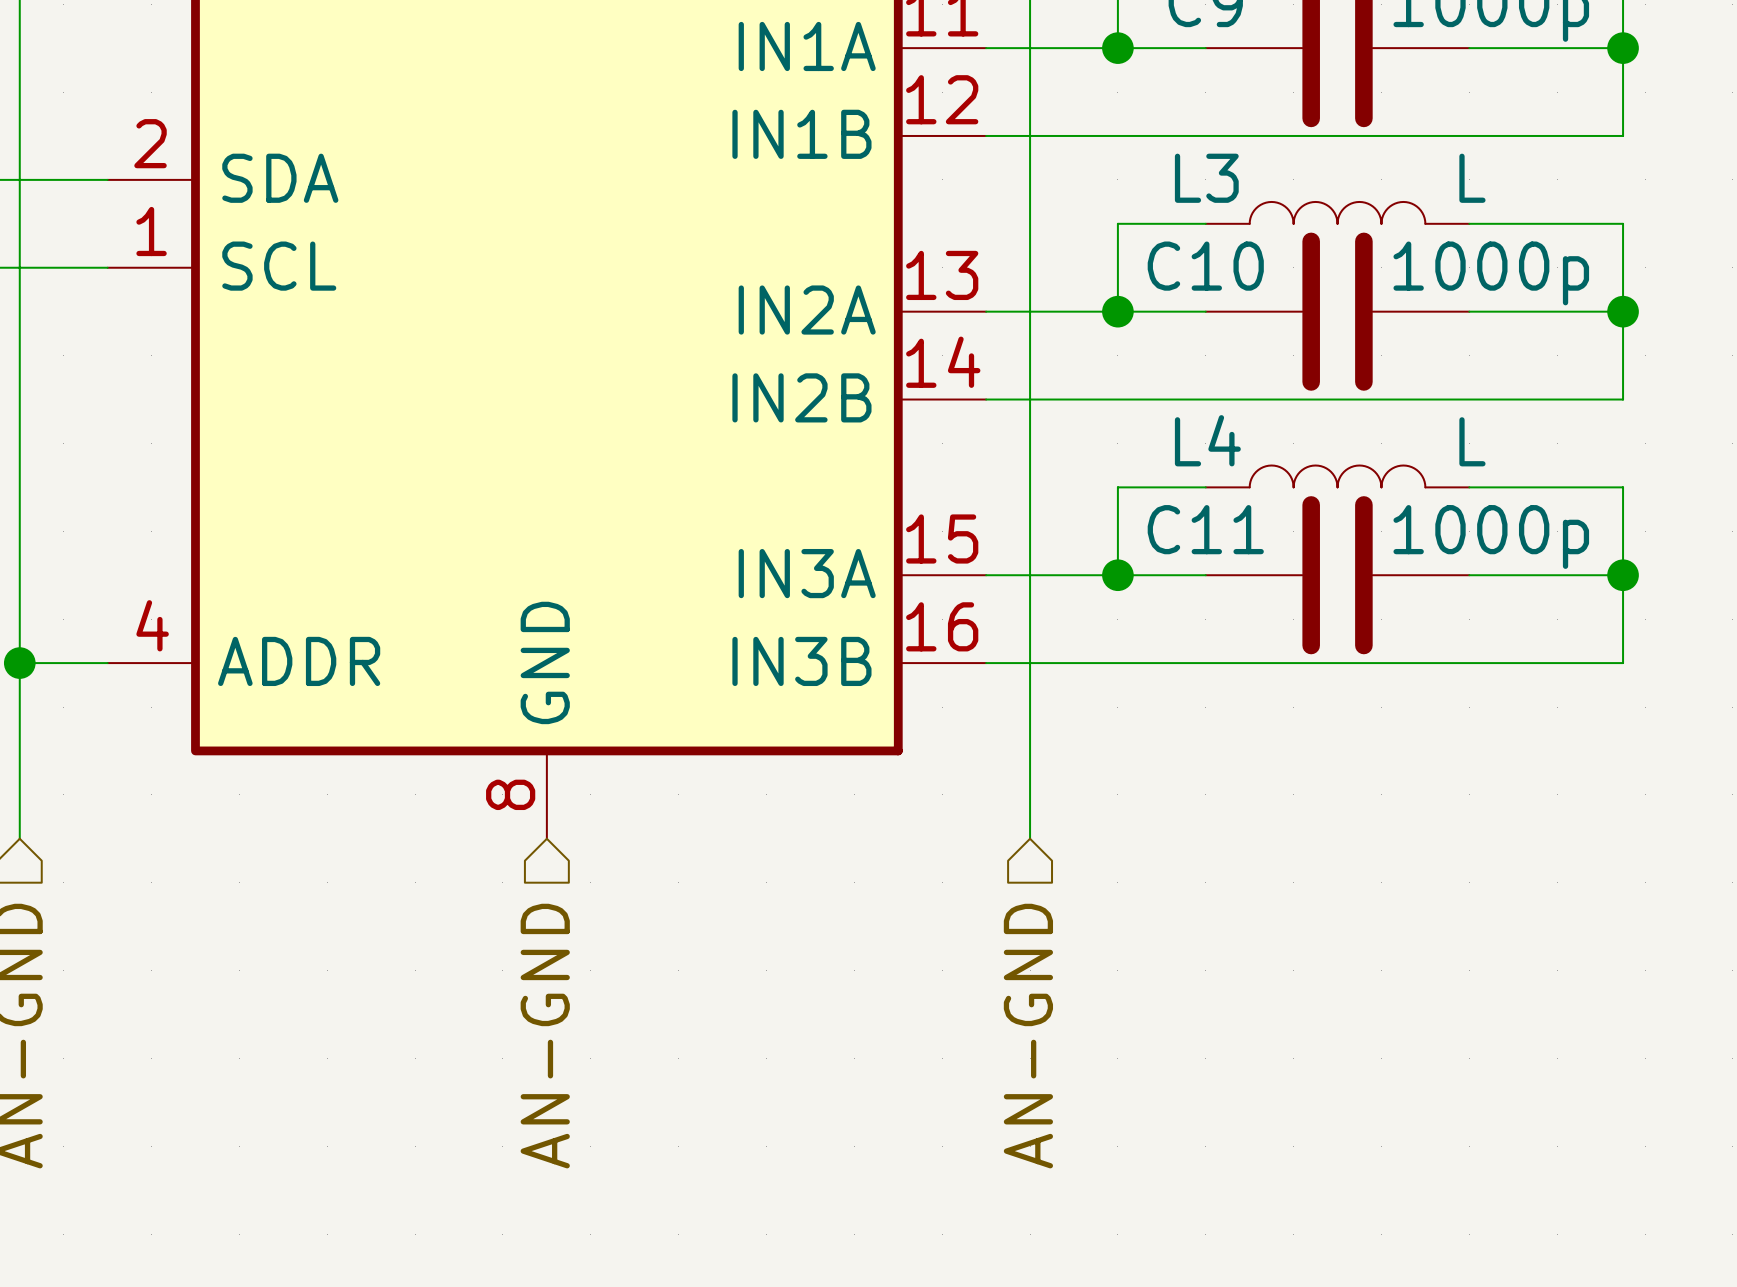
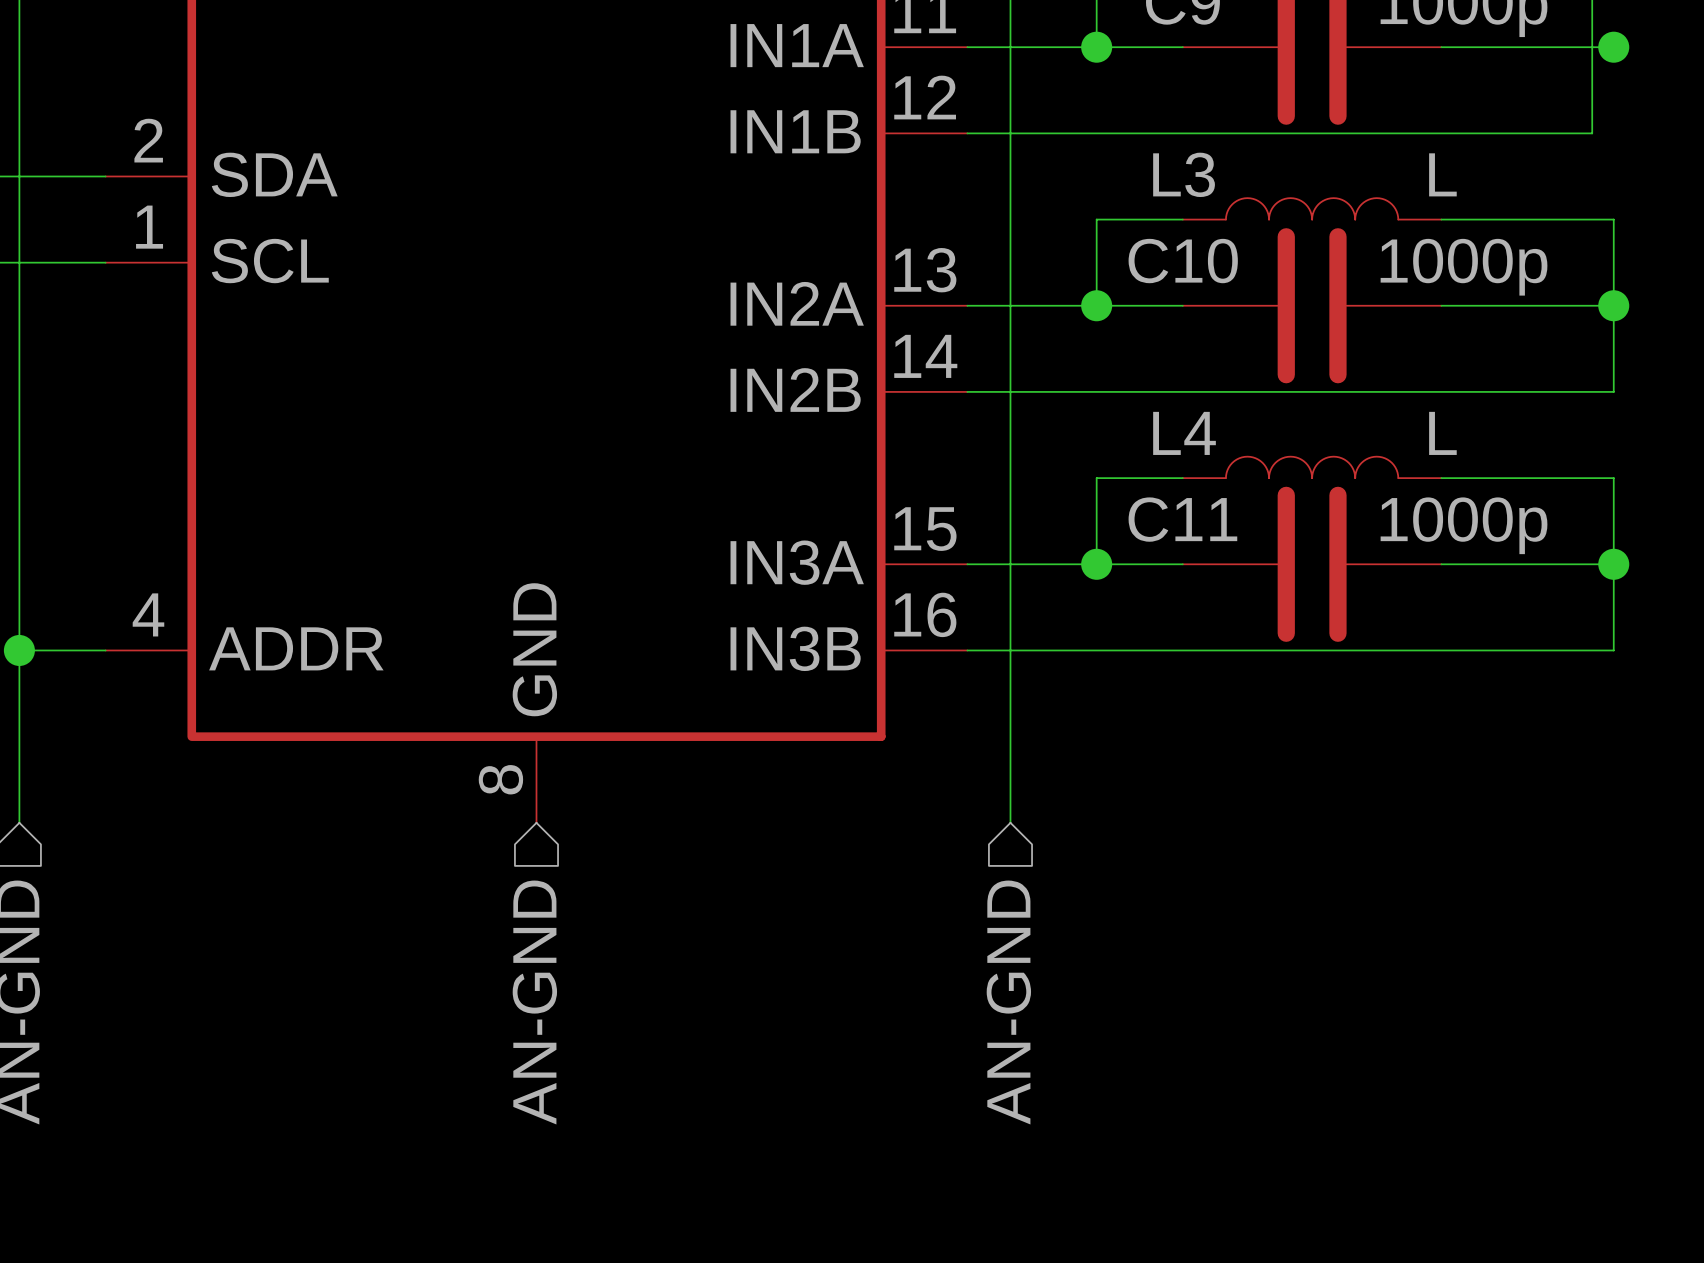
junction position: (1623, 48) -> (1613, 47)
wire: (1623, 223) (1623, 399) -> (1592, 219) (1613, 219) (1613, 391) (1592, 391)
junction position: (1623, 311) -> (1613, 305)
wire: (1623, 487) (1623, 663) -> (1592, 478) (1613, 478) (1613, 650) (1592, 650)
junction position: (1623, 575) -> (1613, 564)

